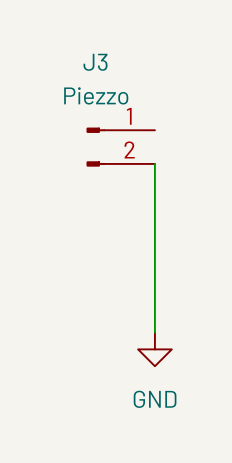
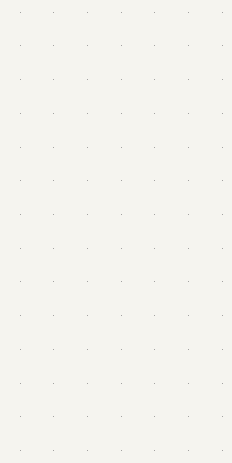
J3: Piezzo (120, 147) -> none
wire: (154, 163) (154, 332) -> none
power symbol: GND (154, 349) -> none

